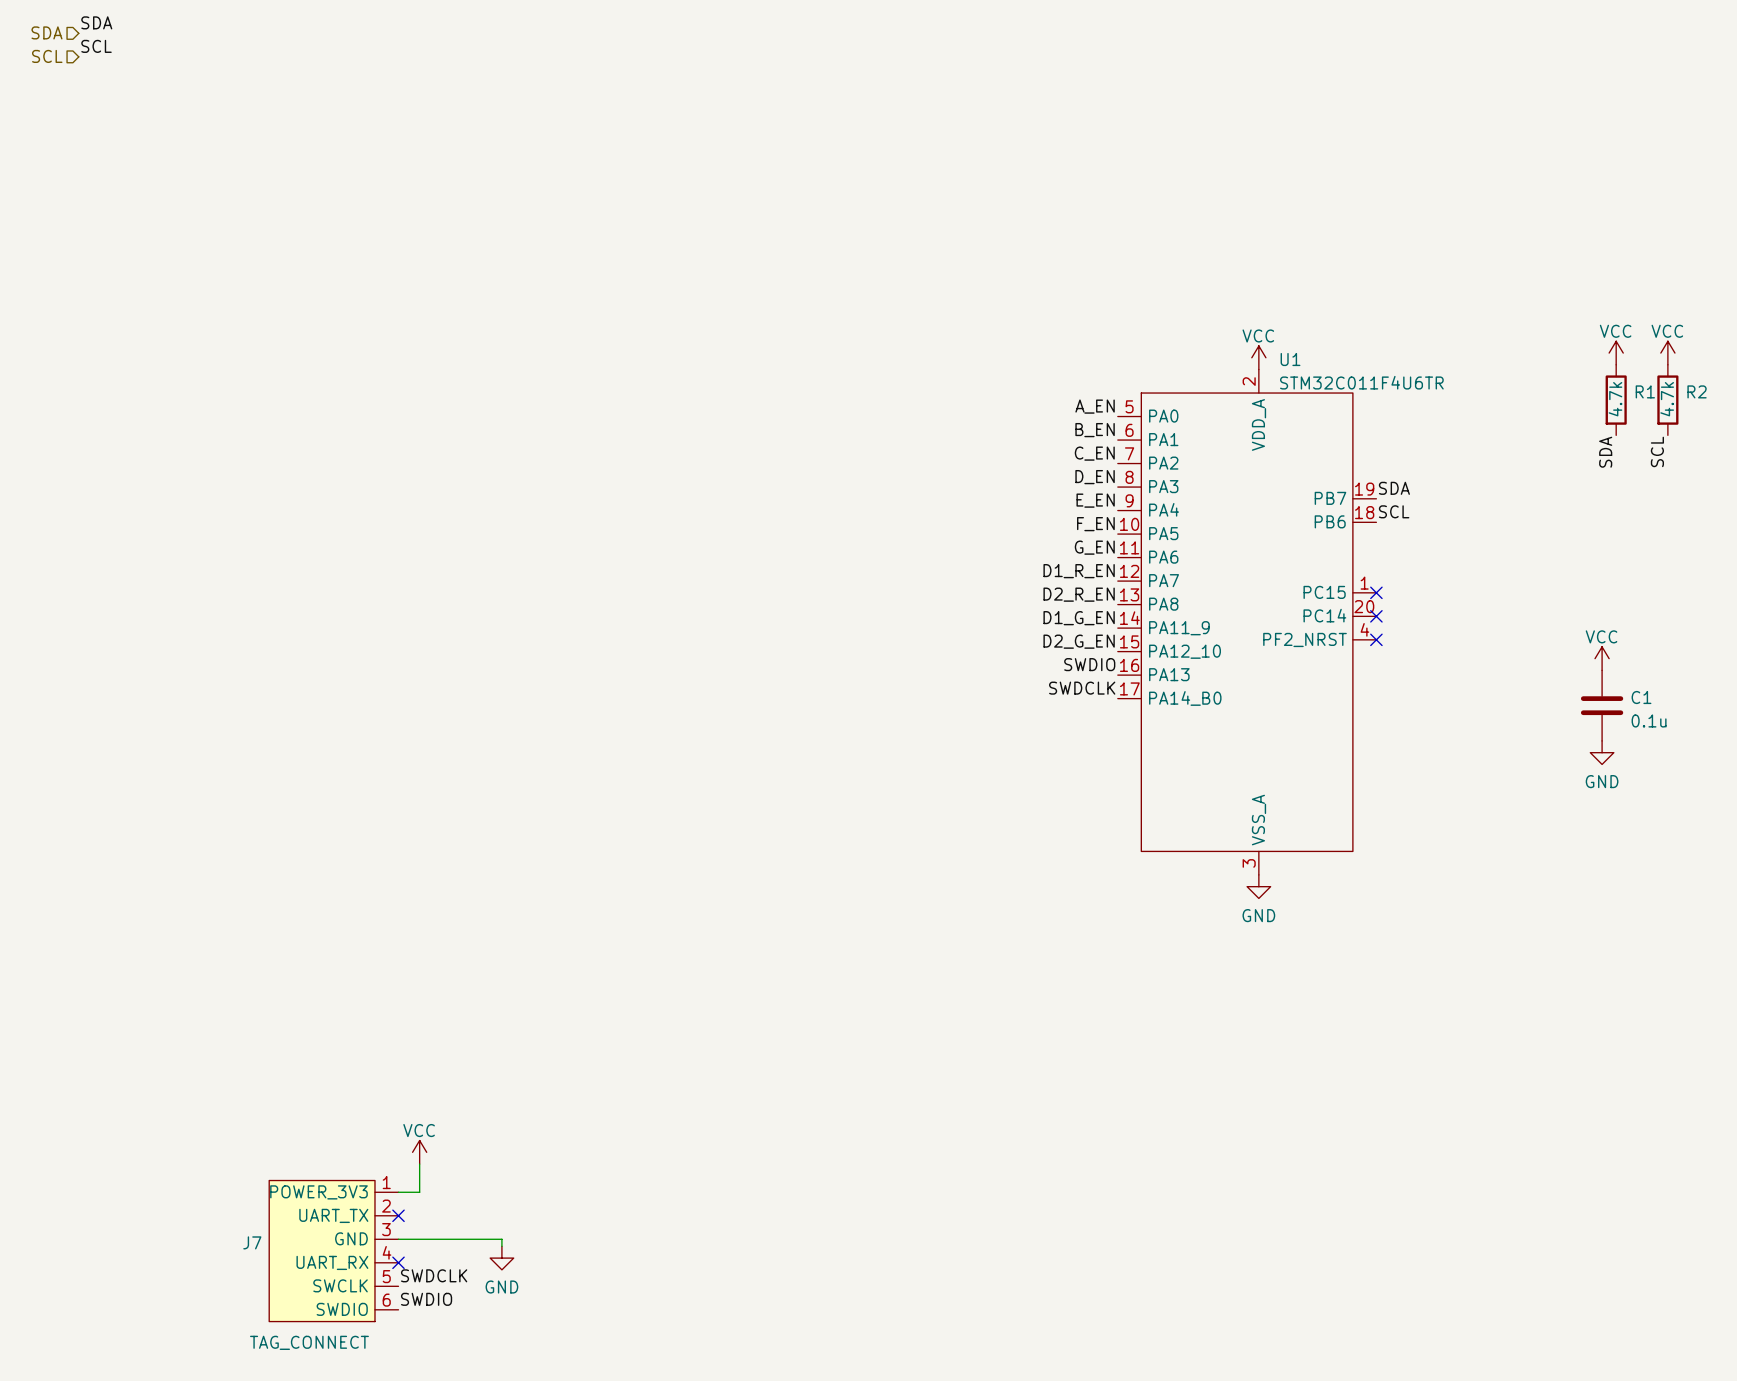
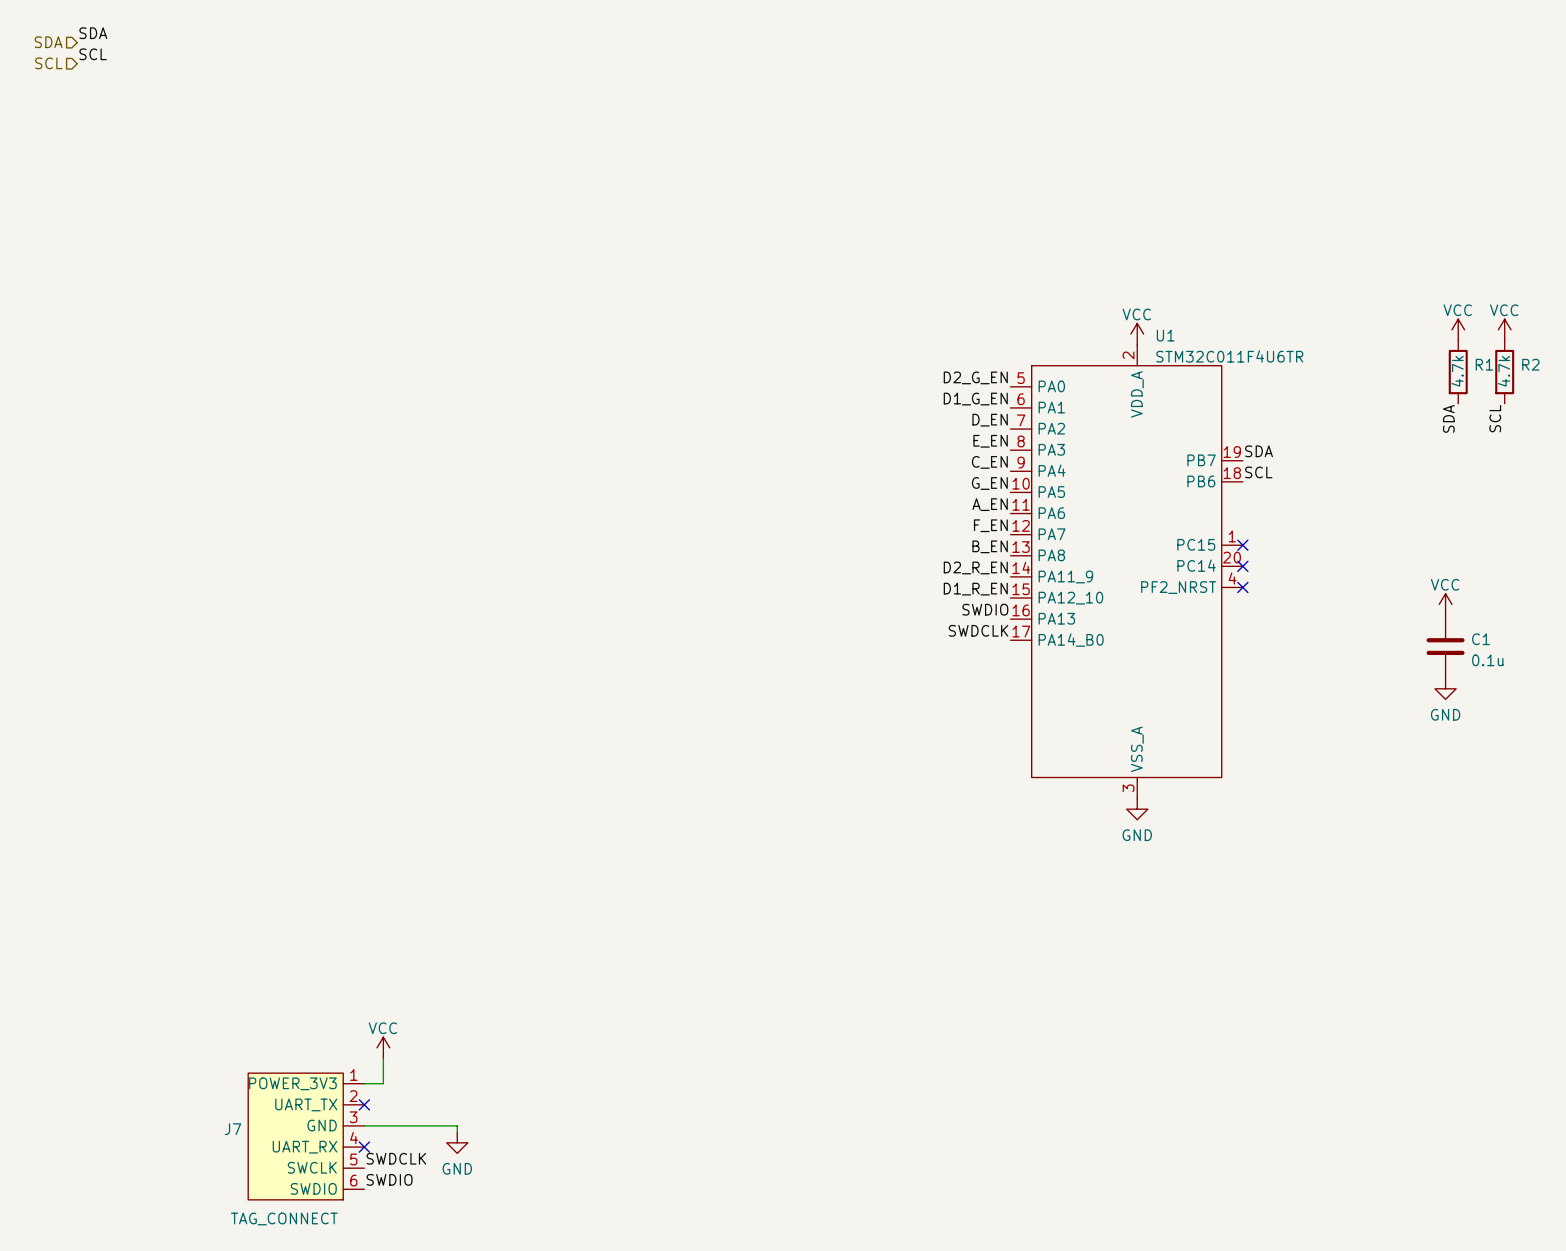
label: A_EN (1095, 406) -> D2_G_EN (975, 377)
label: B_EN (1095, 430) -> D1_G_EN (975, 399)
label: C_EN (1094, 453) -> D_EN (990, 420)
label: D_EN (1095, 477) -> E_EN (990, 441)
label: E_EN (1095, 500) -> C_EN (989, 462)
label: F_EN (1095, 524) -> G_EN (989, 483)
label: G_EN (1094, 547) -> A_EN (990, 504)
label: D1_R_EN (1079, 571) -> F_EN (990, 525)
label: D2_R_EN (1079, 594) -> B_EN (990, 546)
label: D1_G_EN (1079, 618) -> D2_R_EN (975, 567)
label: D2_G_EN (1079, 641) -> D1_R_EN (975, 589)

